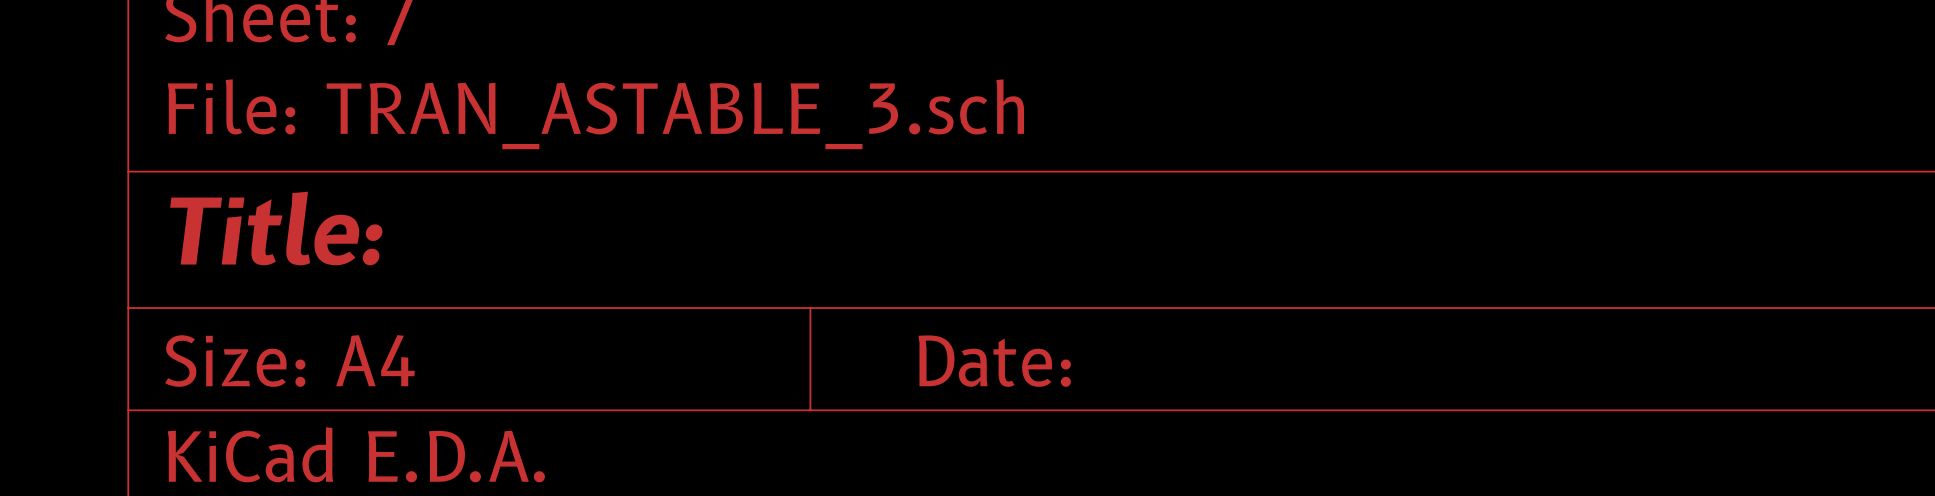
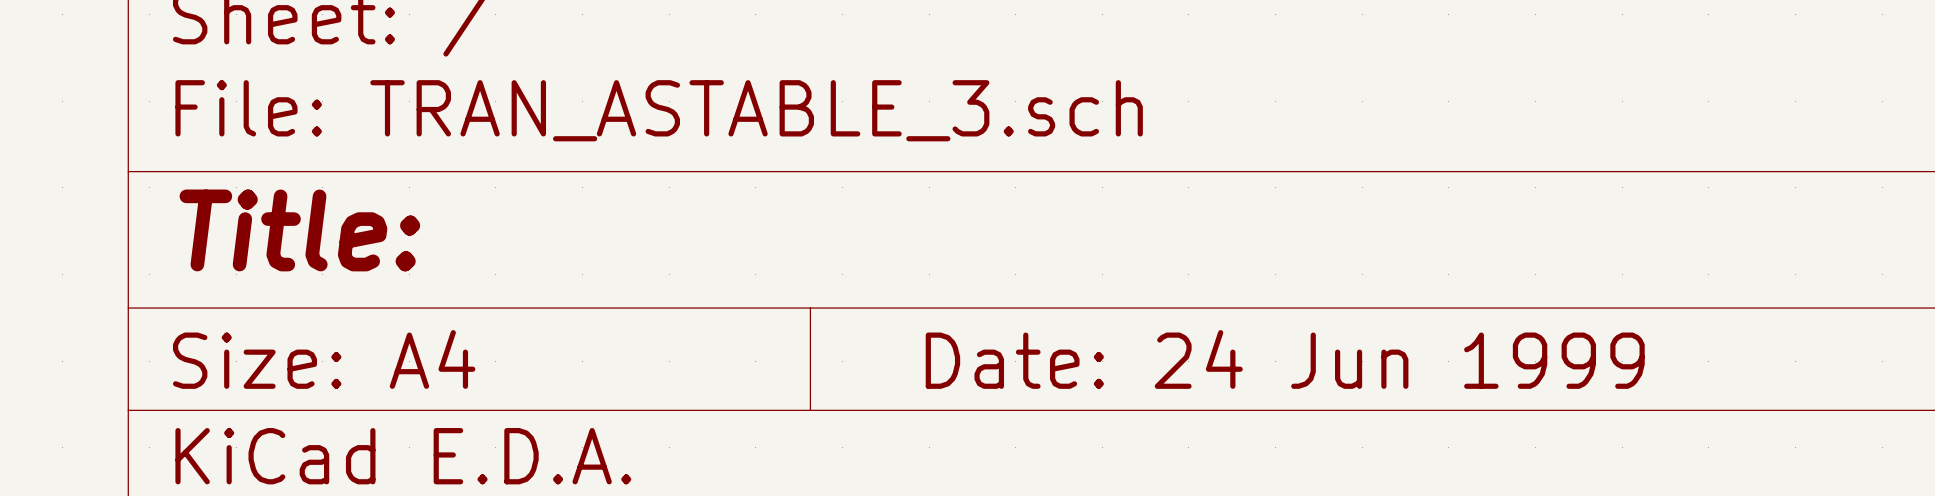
title block: Date: (994, 361) -> Date: 24 Jun 1999 (1285, 359)

